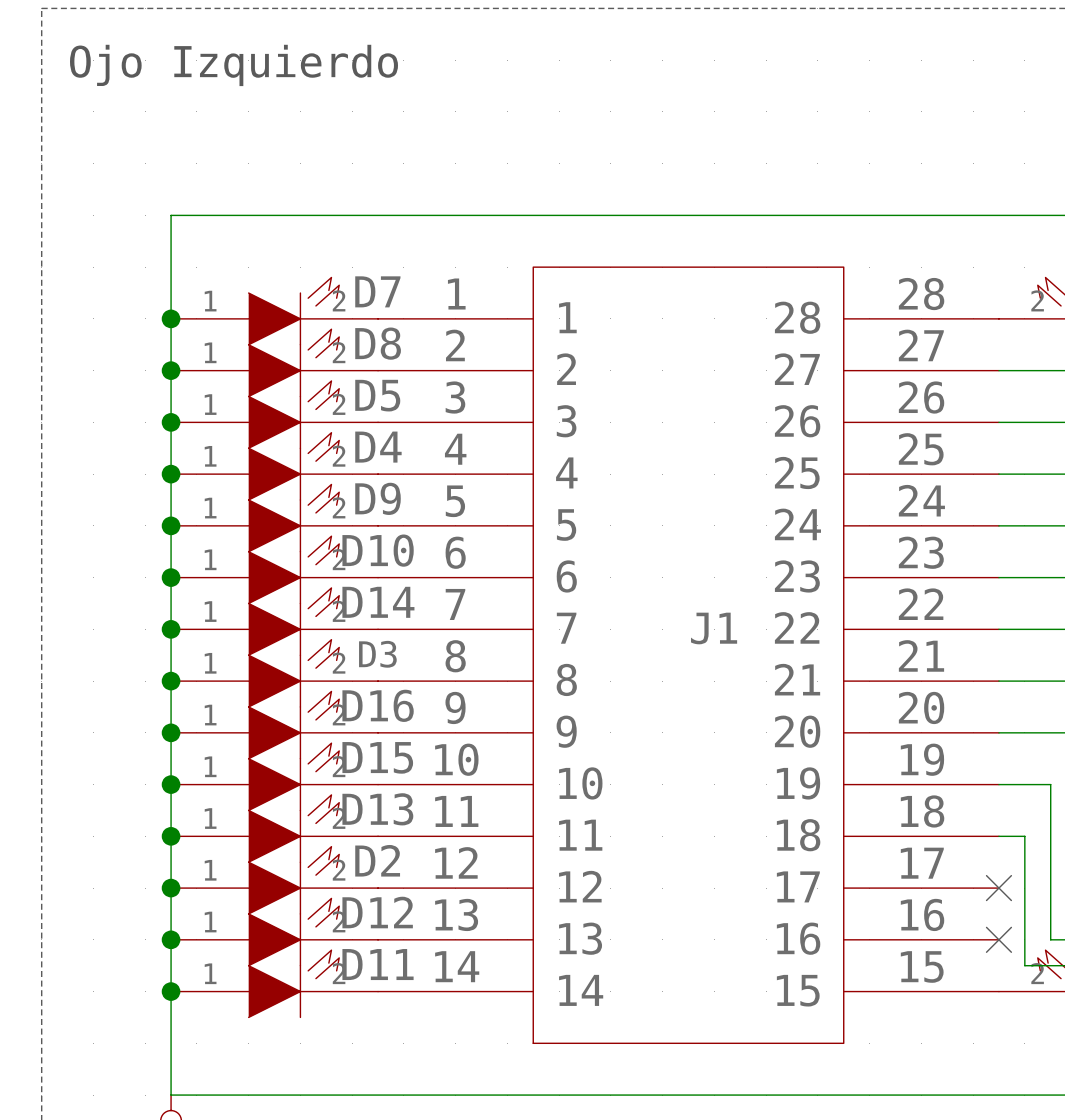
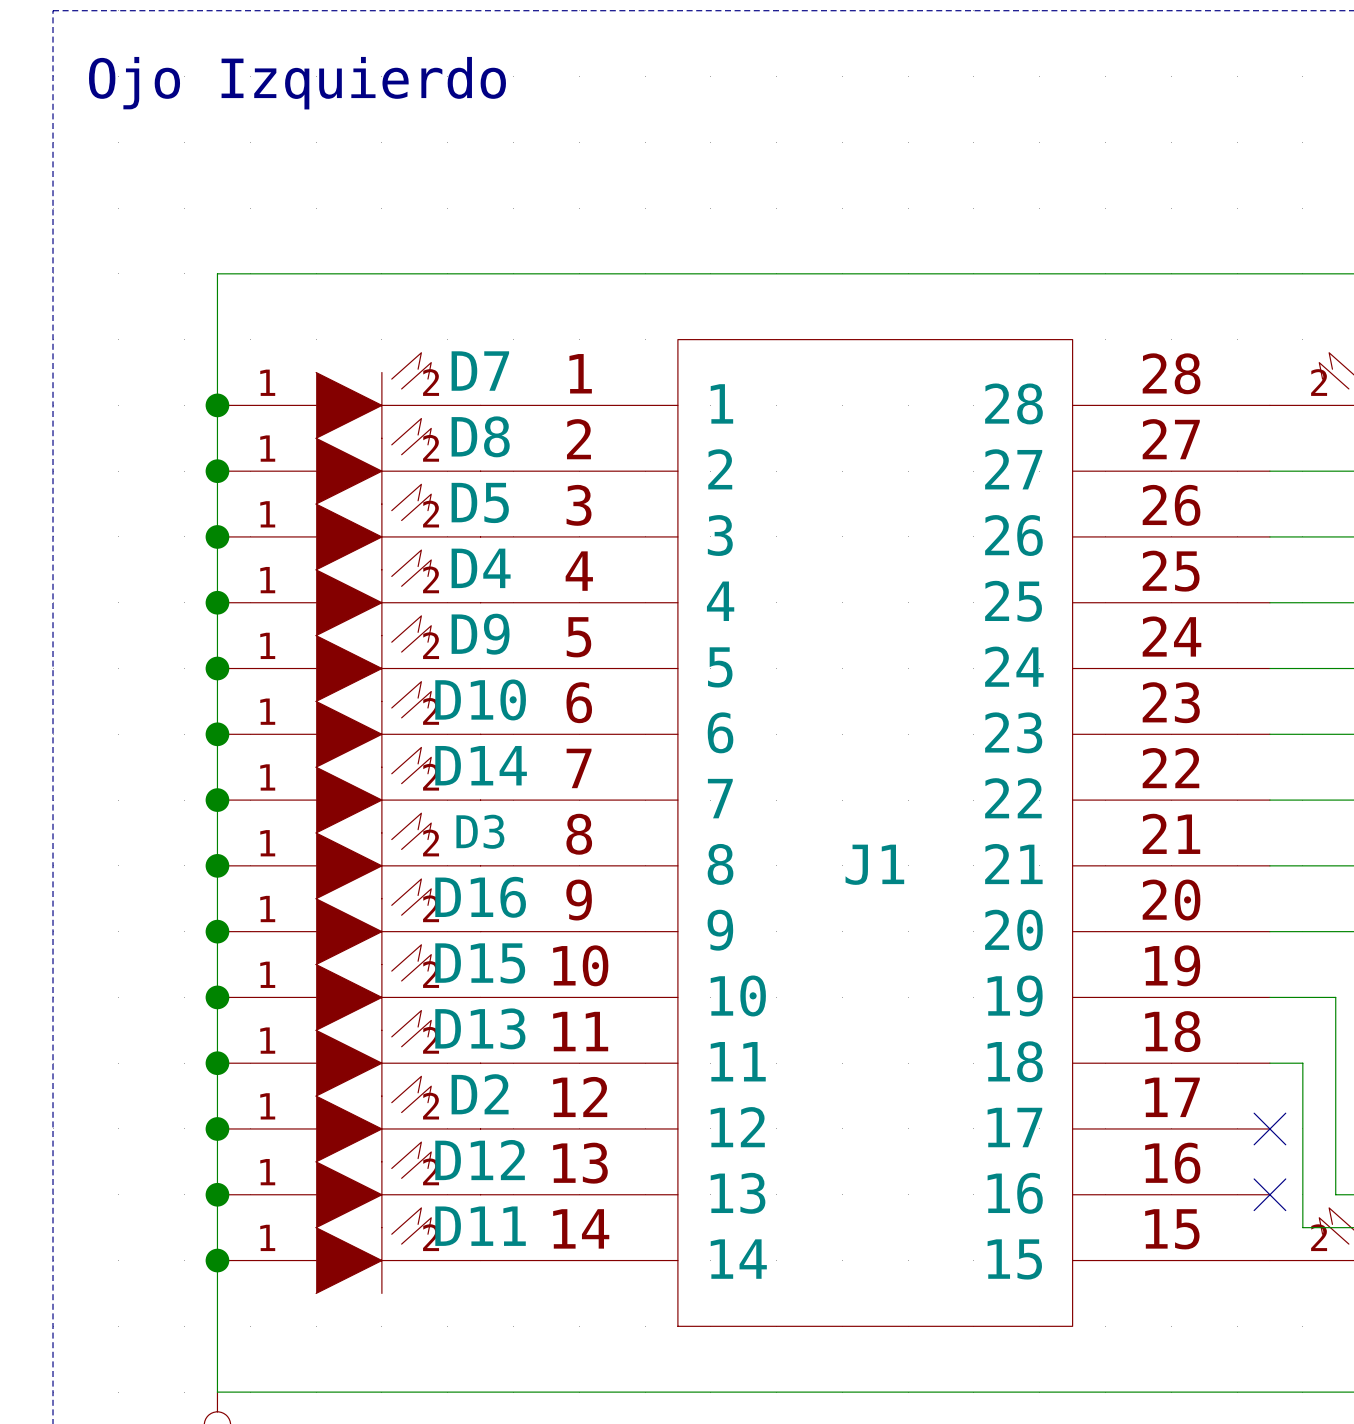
J1 name position: J1 (714, 628) -> J1 (874, 864)

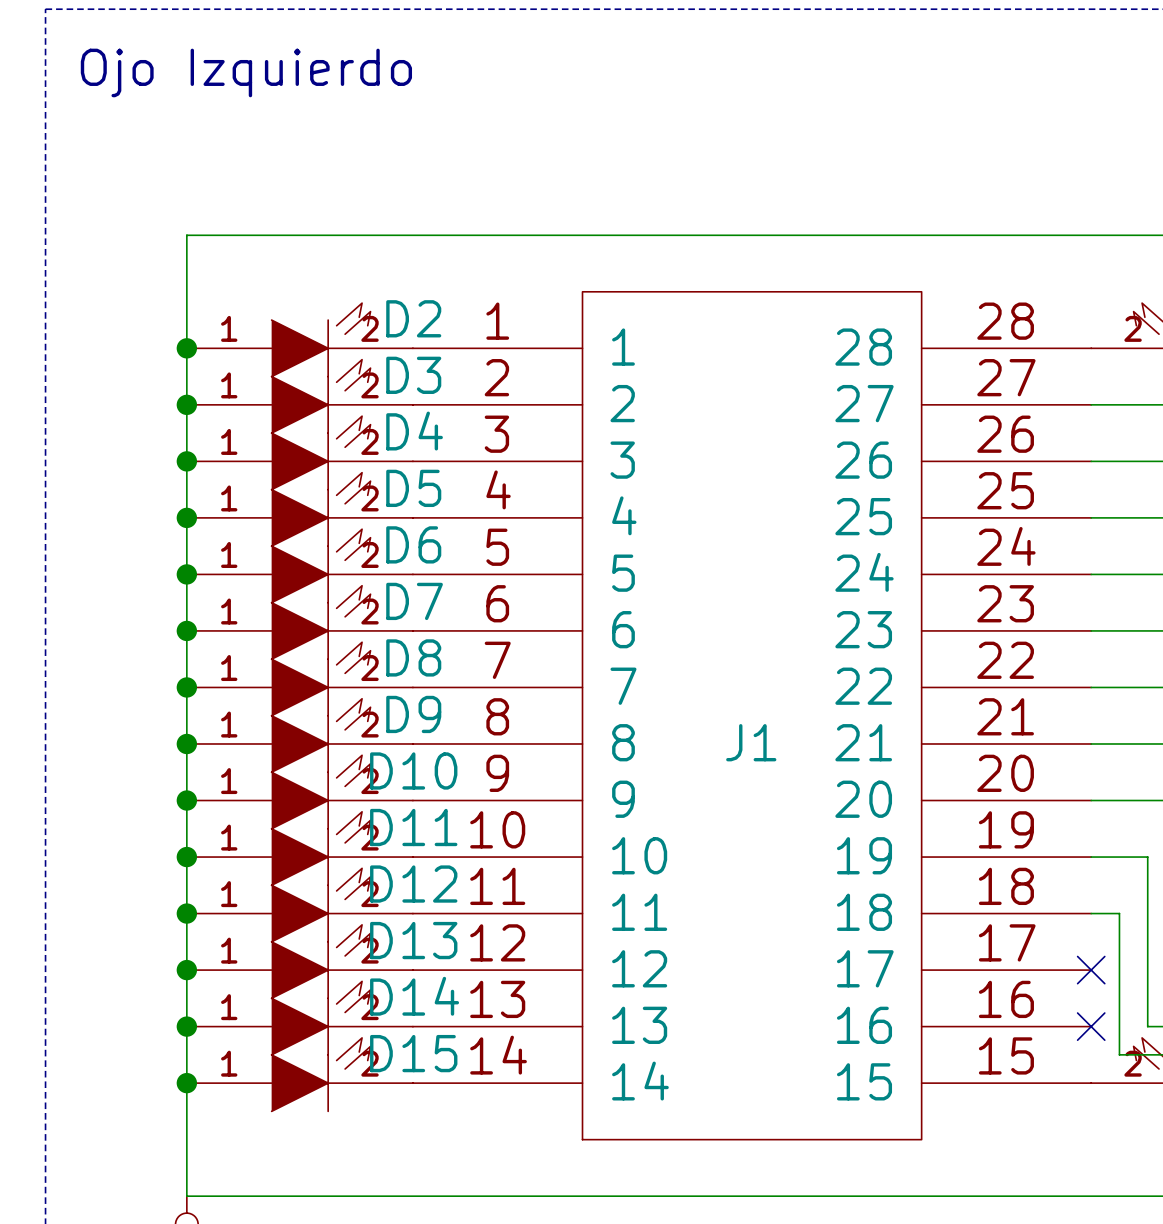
D7 name: D7 (480, 371) -> D2 (413, 318)
D8 name: D8 (480, 436) -> D3 (413, 375)
D5 name: D5 (480, 502) -> D4 (414, 431)
D4 name: D4 (481, 568) -> D5 (413, 488)
D9 name: D9 (480, 634) -> D6 (413, 544)
D10 name: D10 (480, 699) -> D7 (414, 601)
D14 name: D14 (481, 765) -> D8 (413, 657)
D3 name: D3 (480, 831) -> D9 (413, 714)
D16 name: D16 (480, 897) -> D10 (413, 770)
D15 name: D15 (480, 963) -> D11 (413, 827)
D13 name: D13 (480, 1028) -> D12 (413, 884)
D2 name: D2 (480, 1094) -> D13 (413, 940)
D12 name: D12 (480, 1160) -> D14 (414, 996)
D11 name: D11 (480, 1226) -> D15 (413, 1053)

